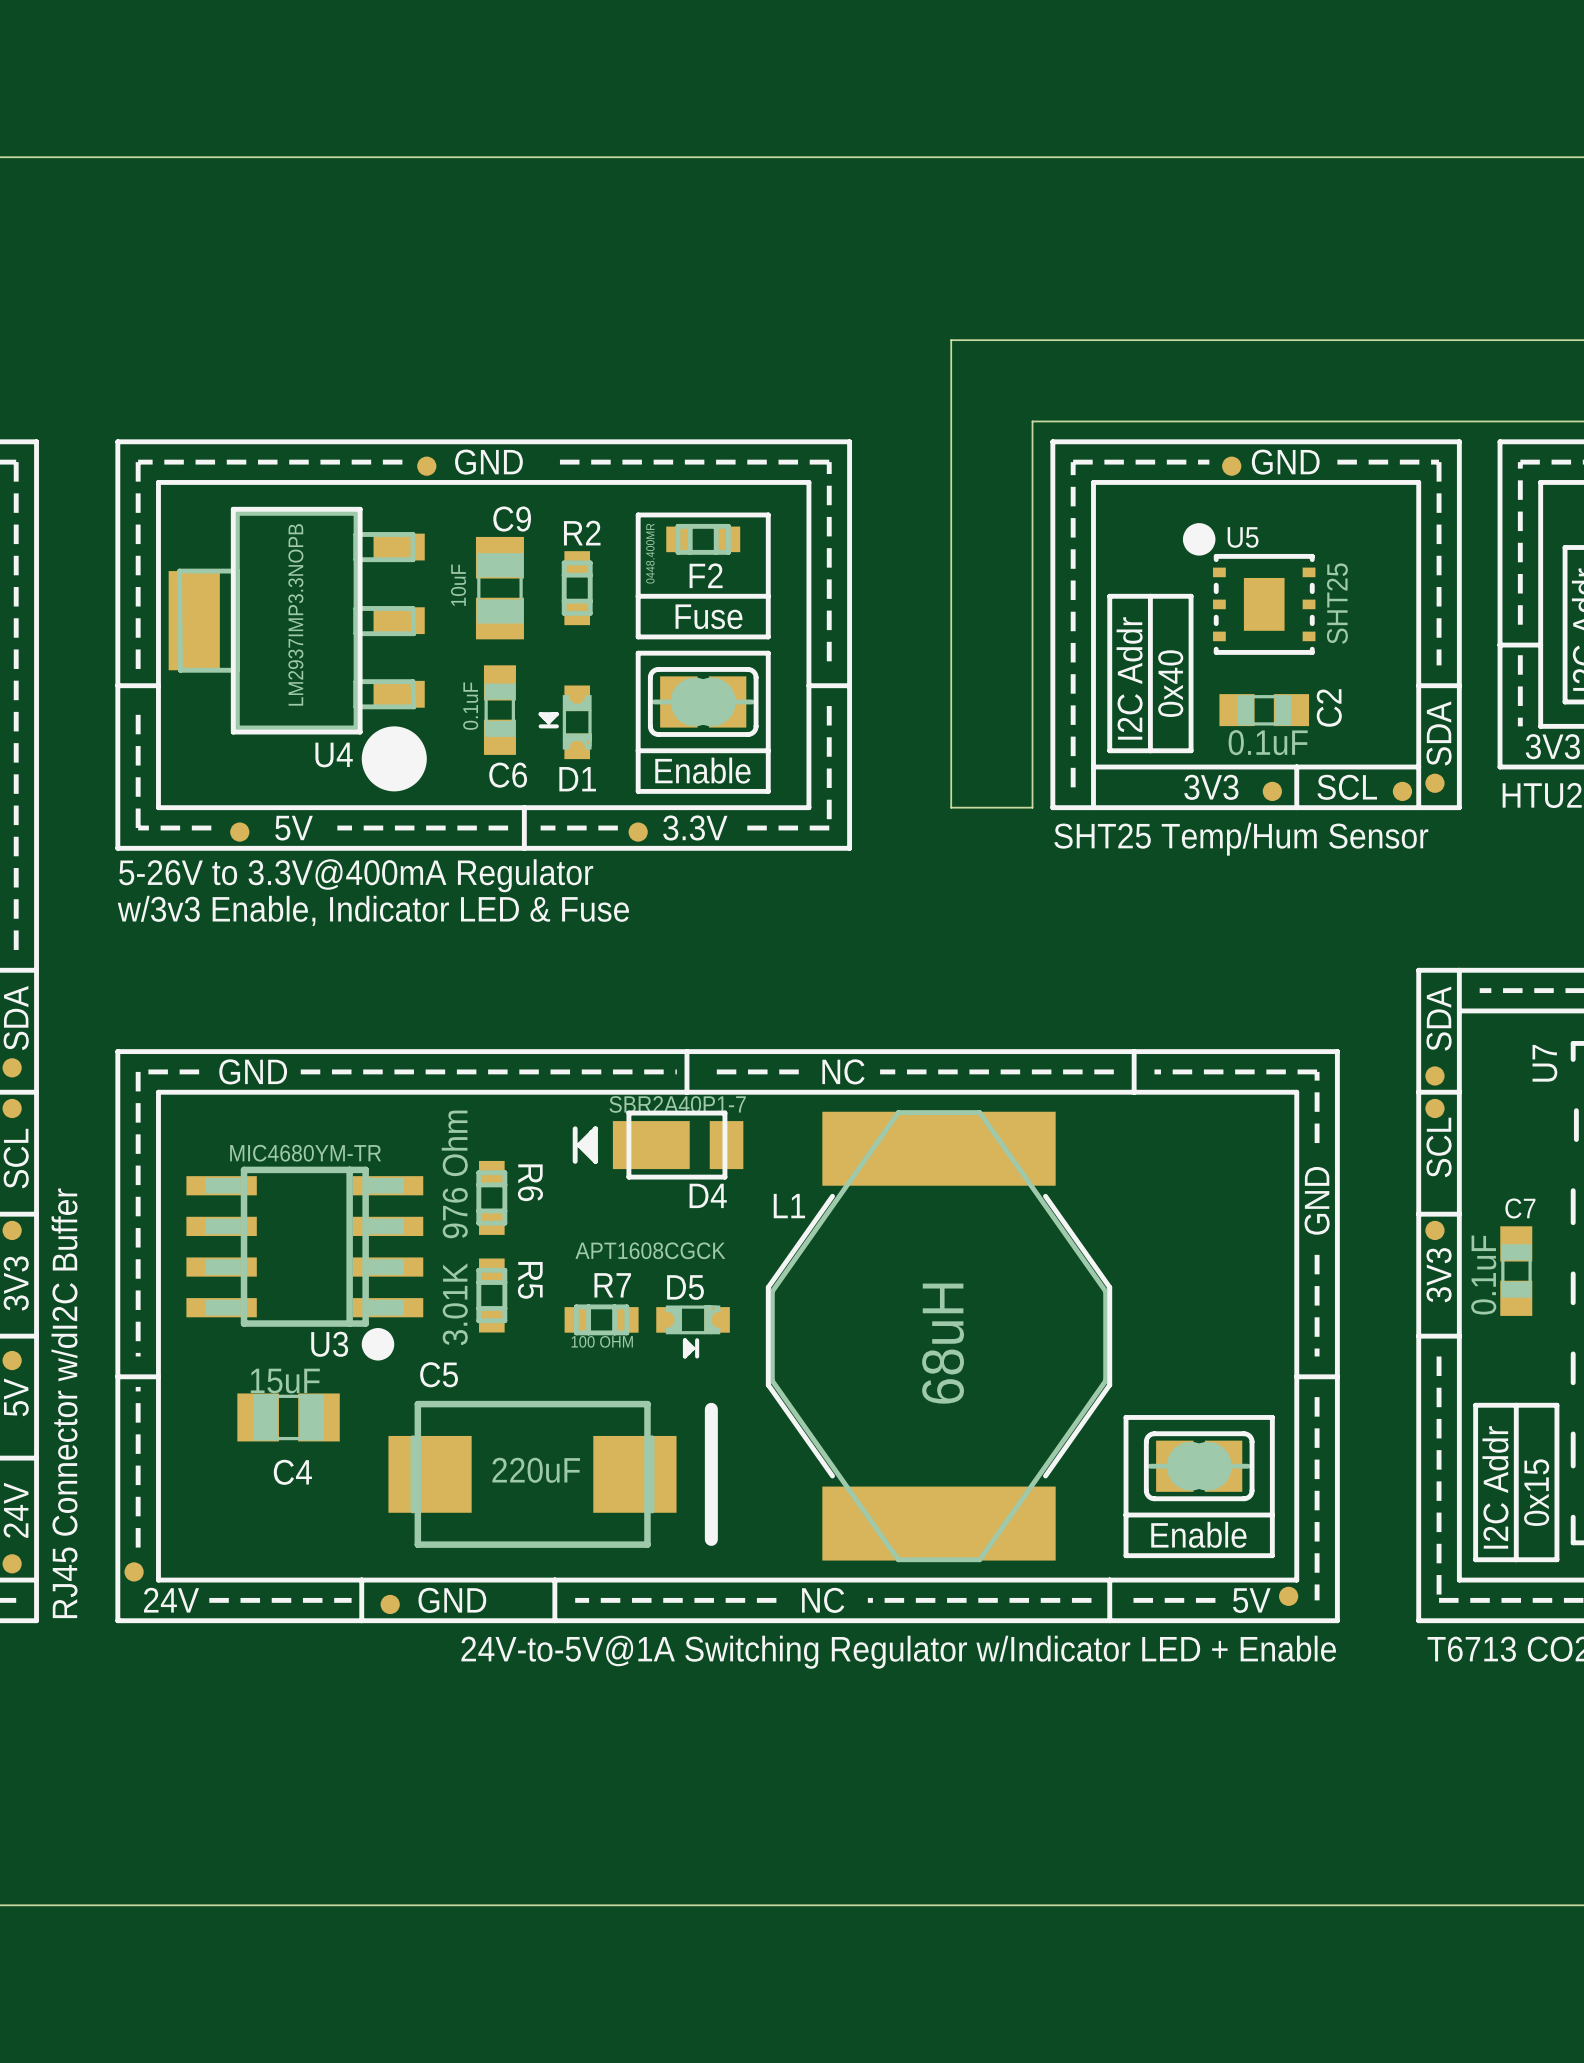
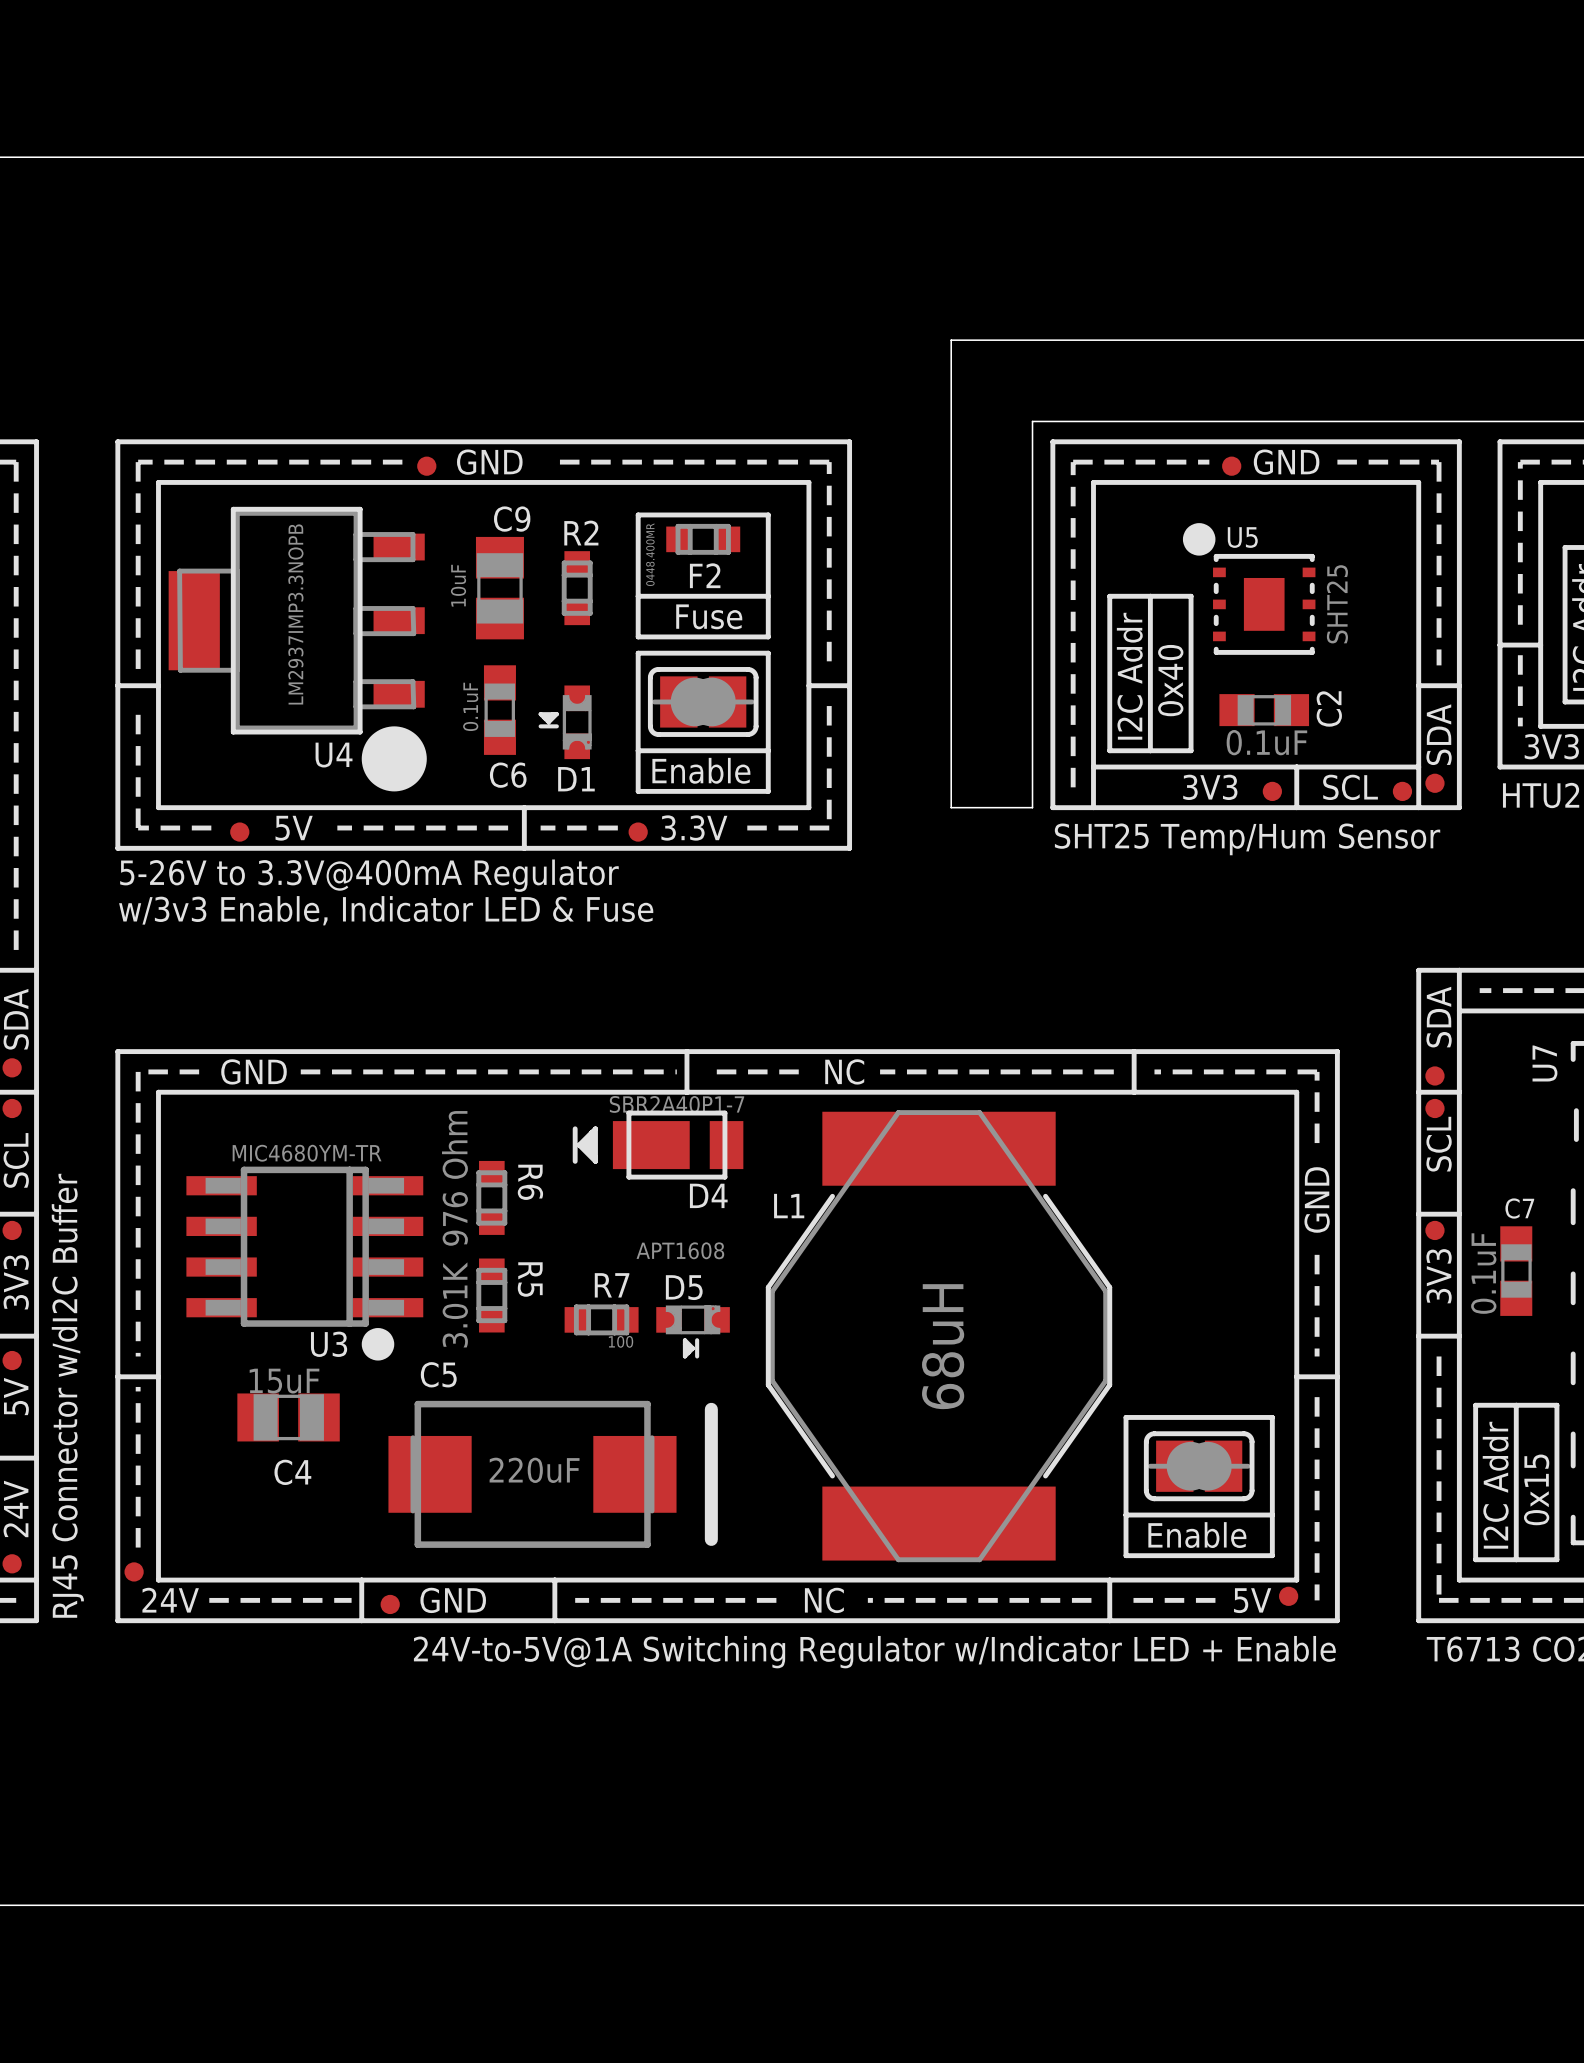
D5 value: APT1608CGCK (650, 1250) -> APT1608 (680, 1250)
R7 value: 100 OHM (602, 1341) -> 100 (621, 1341)

